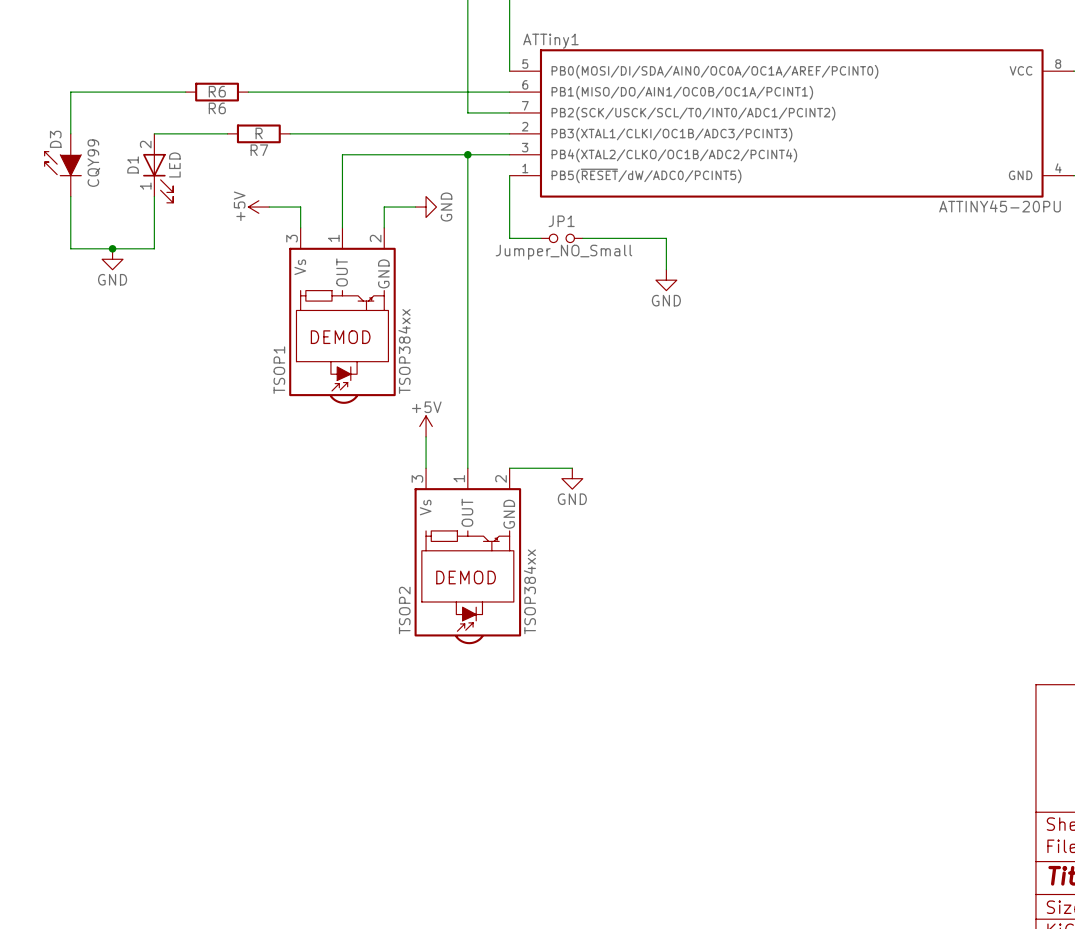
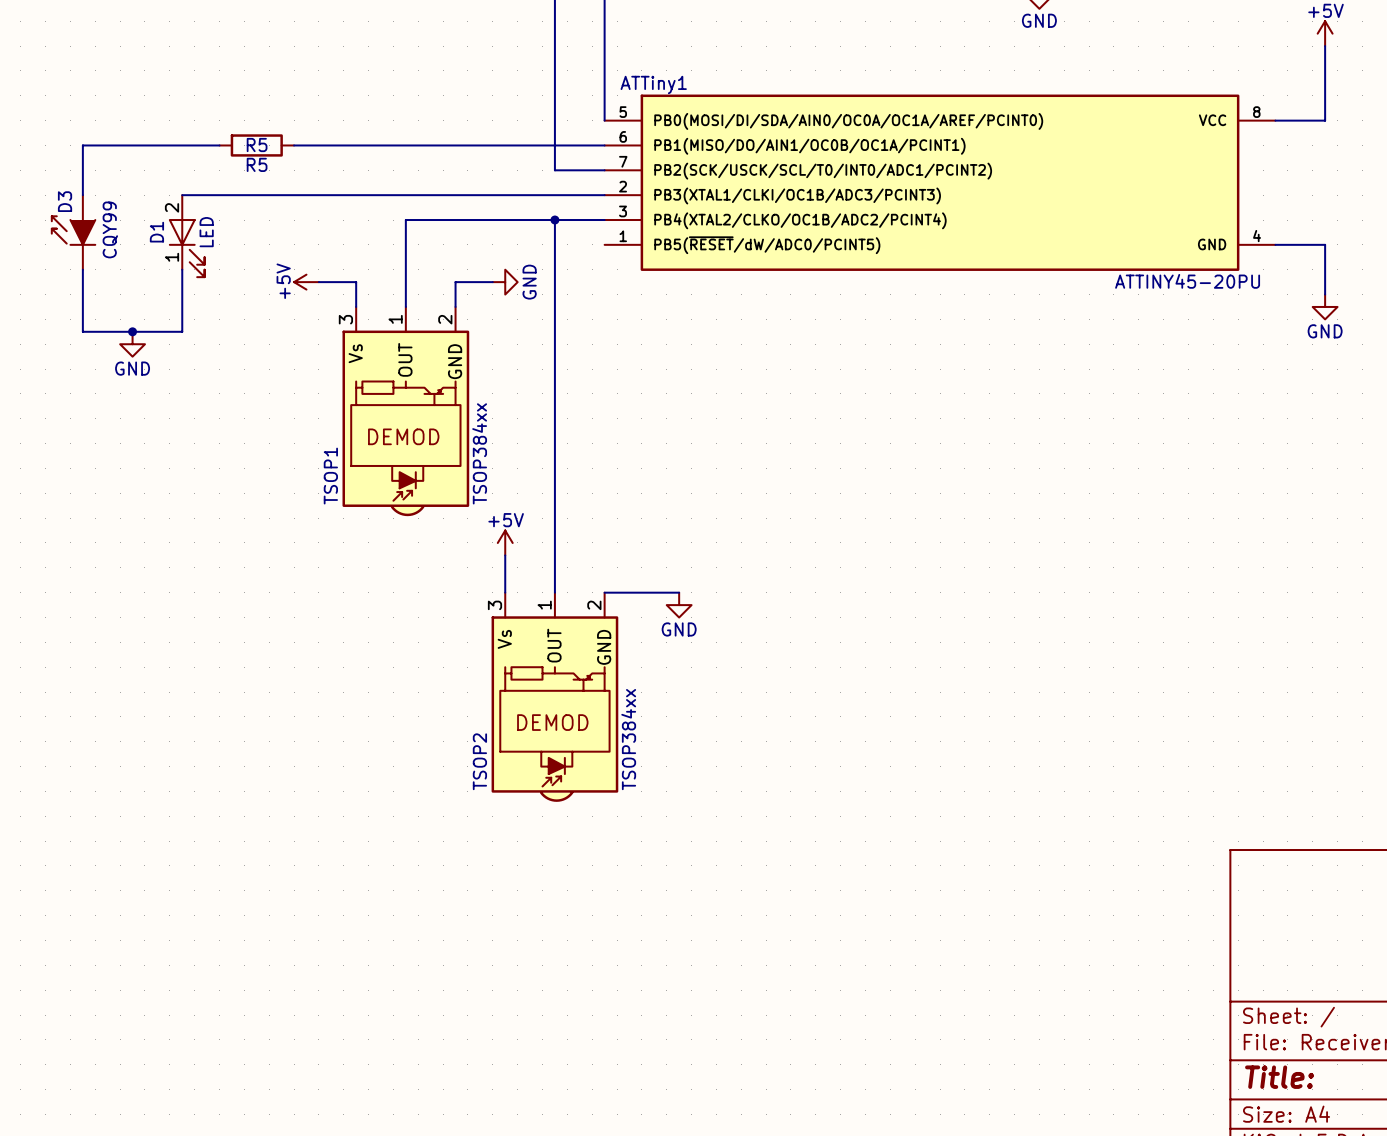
R6 value: R6 (217, 91) -> R5 (257, 145)
R6 name: R6 (217, 108) -> R5 (257, 164)
wire: none -> (269, 195) (343, 195)
R7: R (258, 133) -> none
wire: (509, 175) (509, 238) (540, 238) -> none
JP1: Jumper_NO_Small (561, 238) -> none
wire: (582, 238) (666, 238) (666, 269) -> none
power symbol: GND (666, 280) -> none

